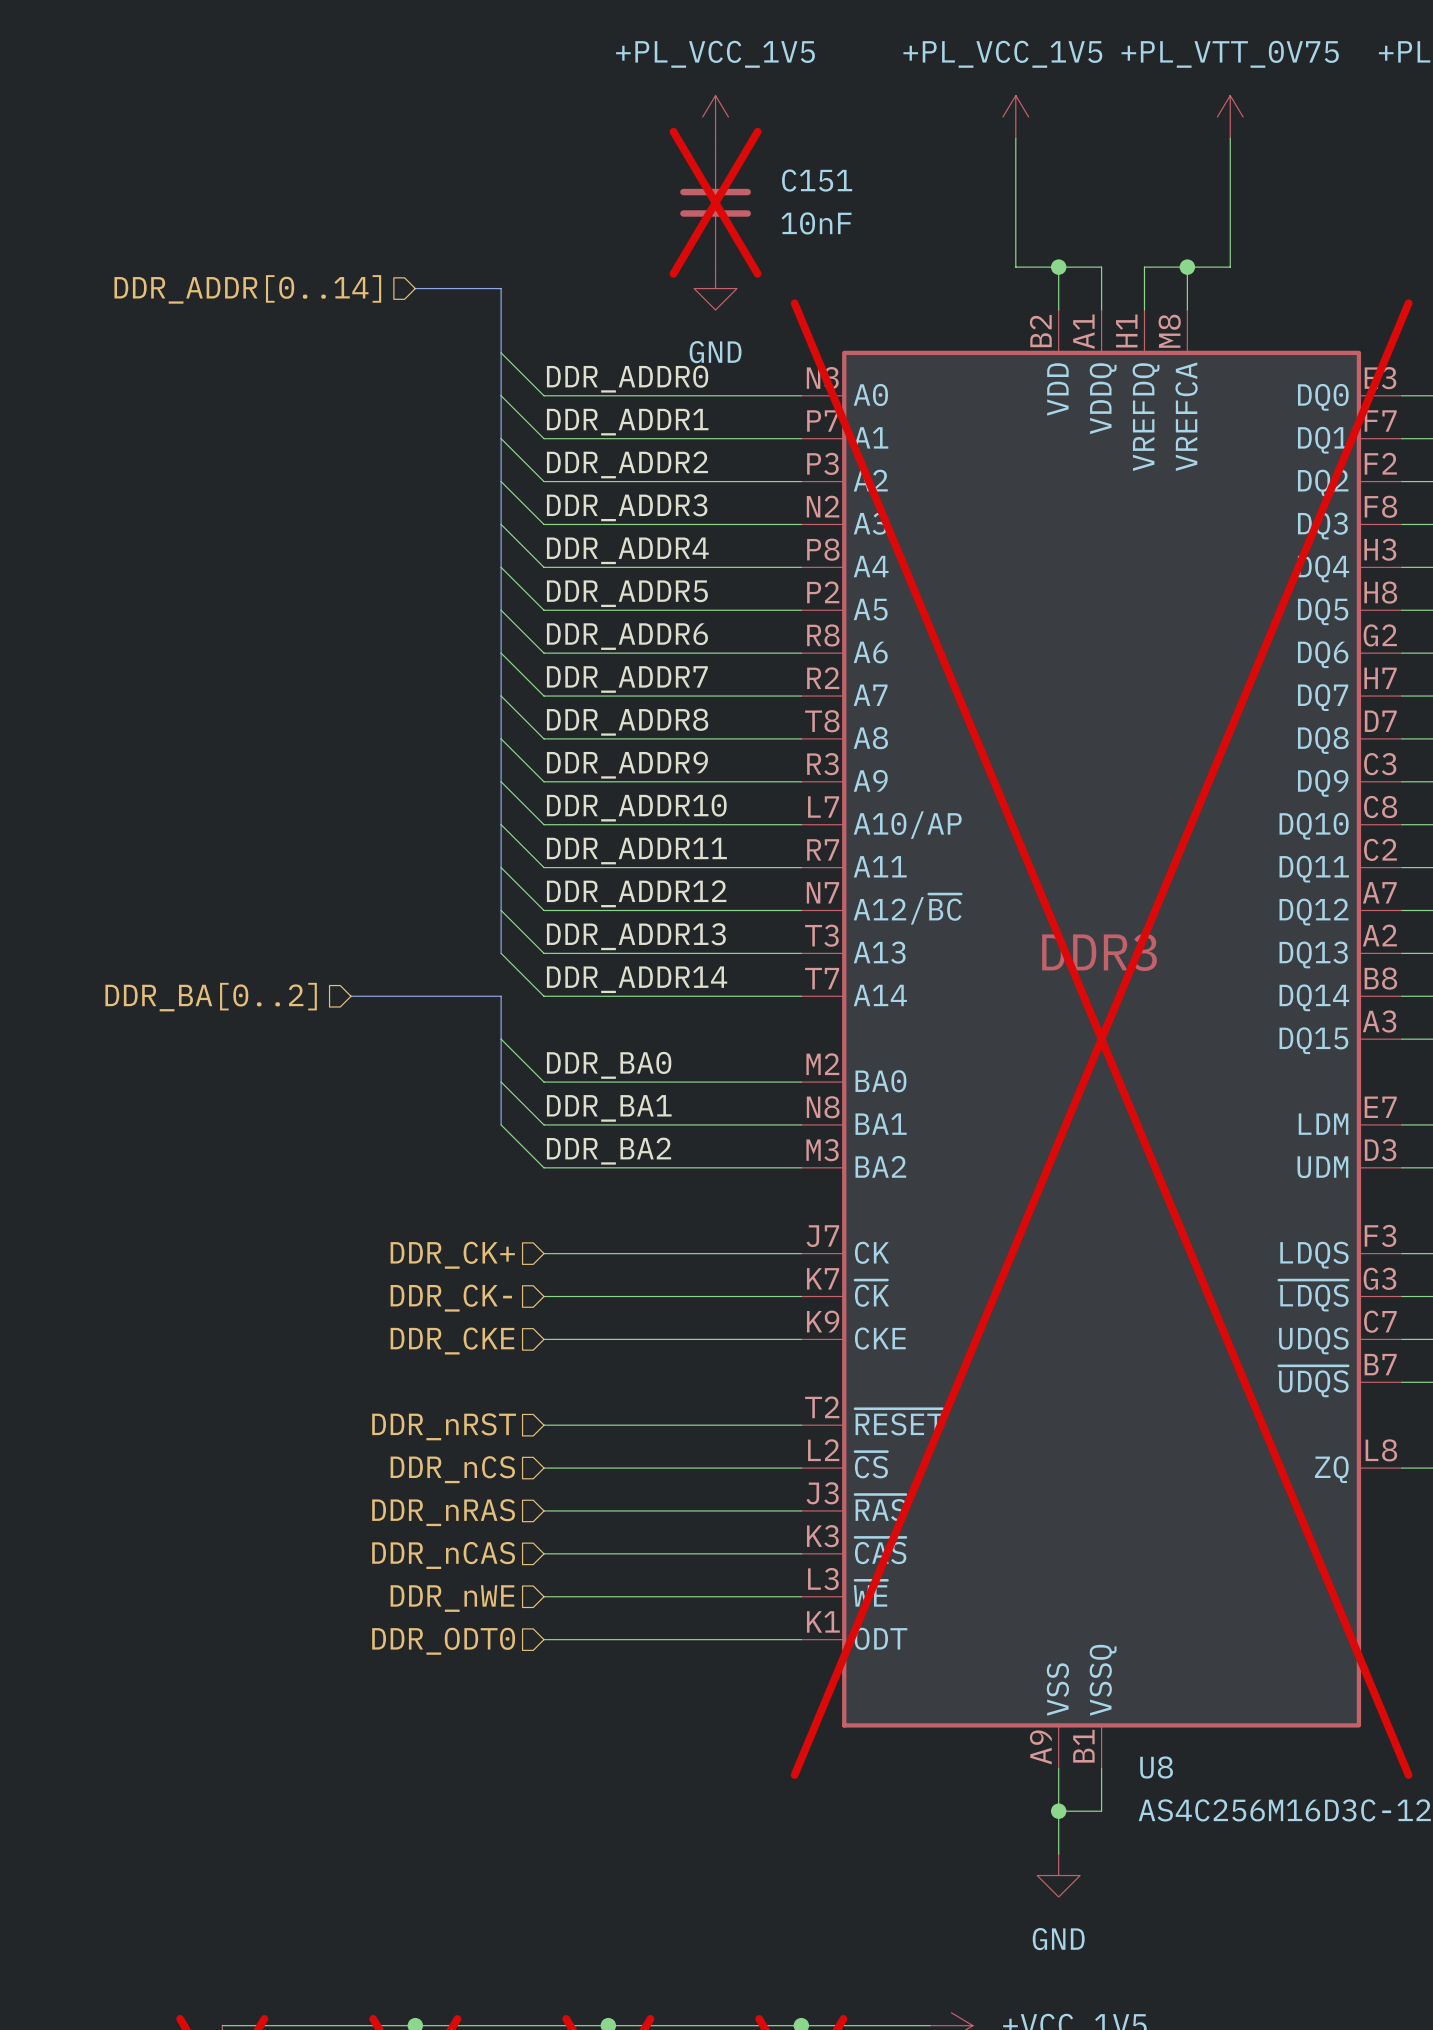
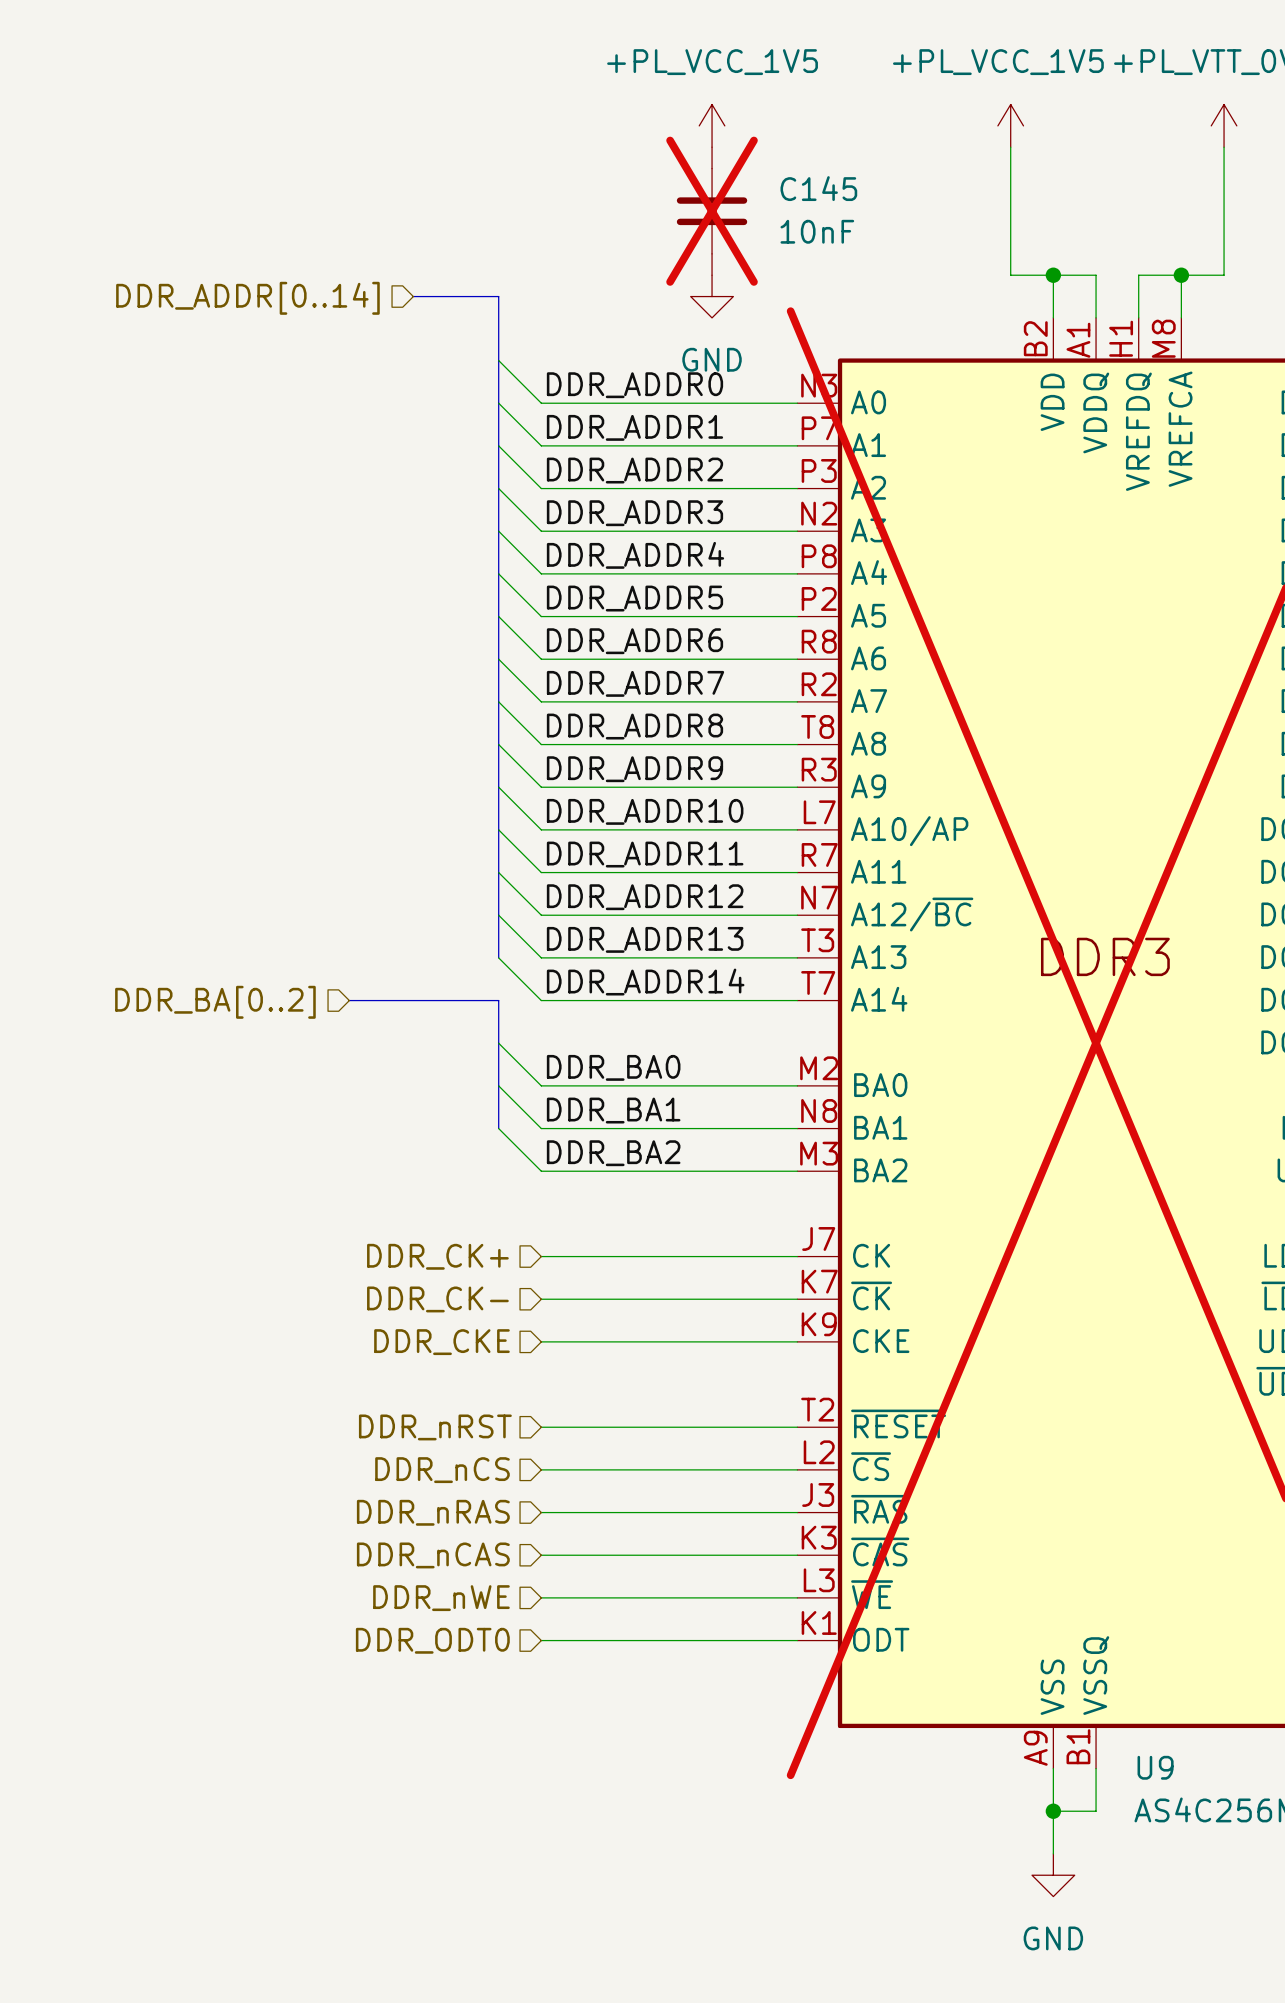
C151 name: C151 (817, 180) -> C145 (818, 188)
U8 name: U8 (1156, 1767) -> U9 (1155, 1767)

